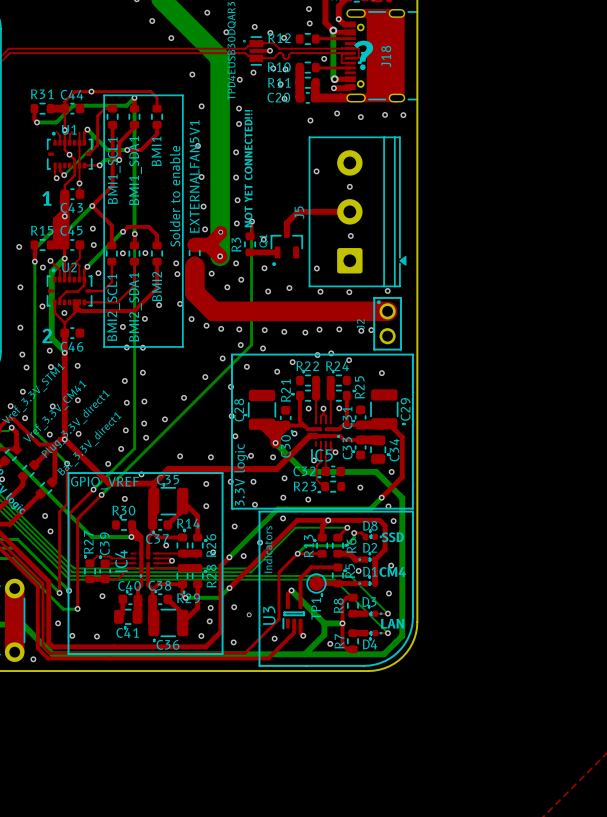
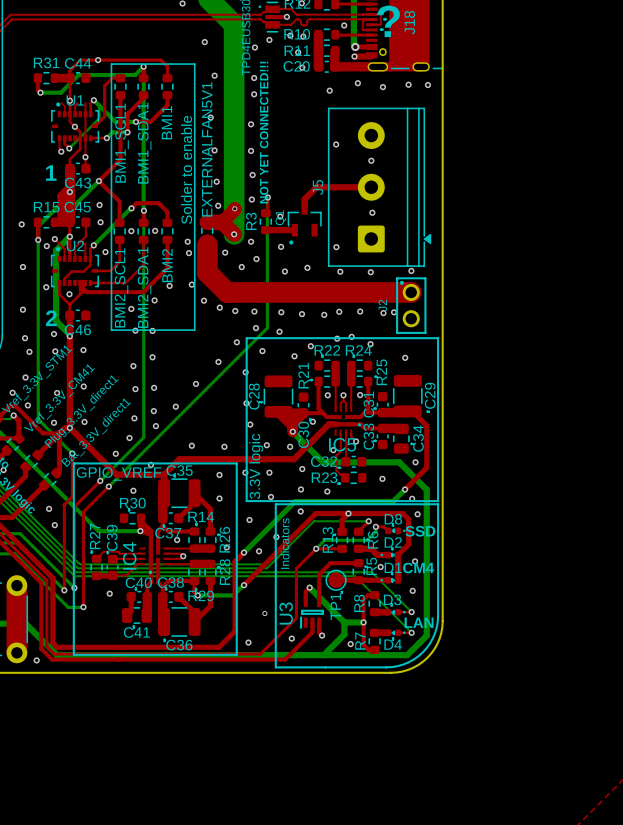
via: (210, 607) -> none
via: (234, 607) -> none
via: (209, 621) -> none
via: (58, 623) -> none
via: (72, 635) -> none
via: (96, 636) -> none
via: (201, 636) -> none

